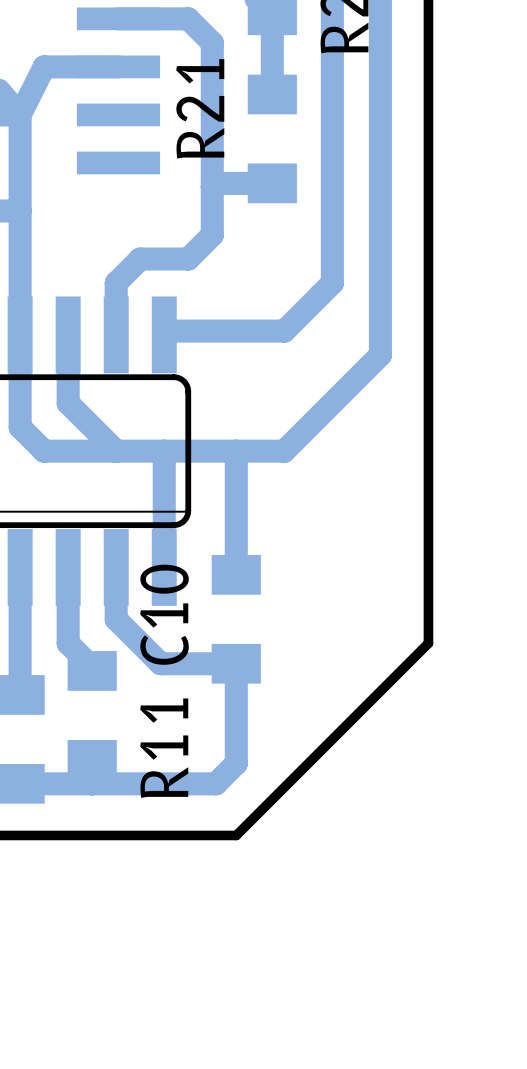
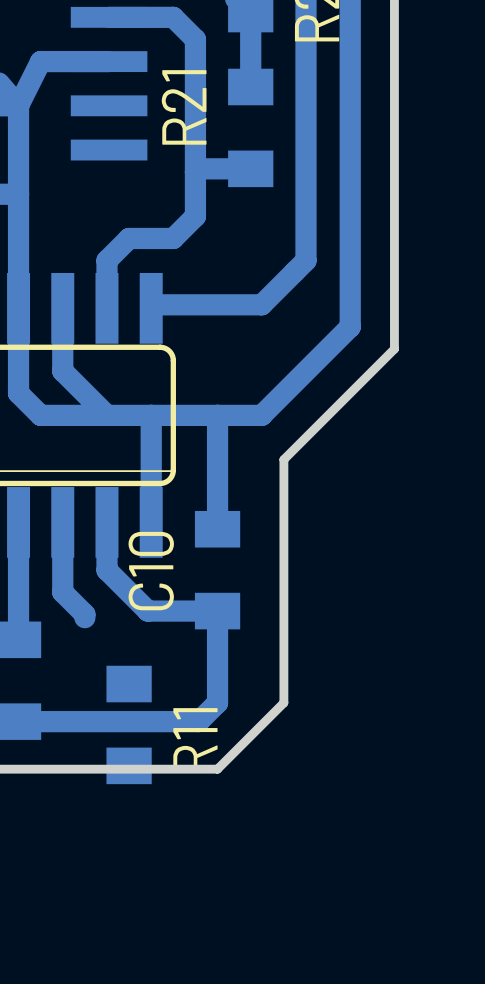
board edge: (428, 379) (428, 643) (308, 763) -> (394, 349) (283, 459) (283, 702)
R11 position: (92, 715) -> (129, 724)

